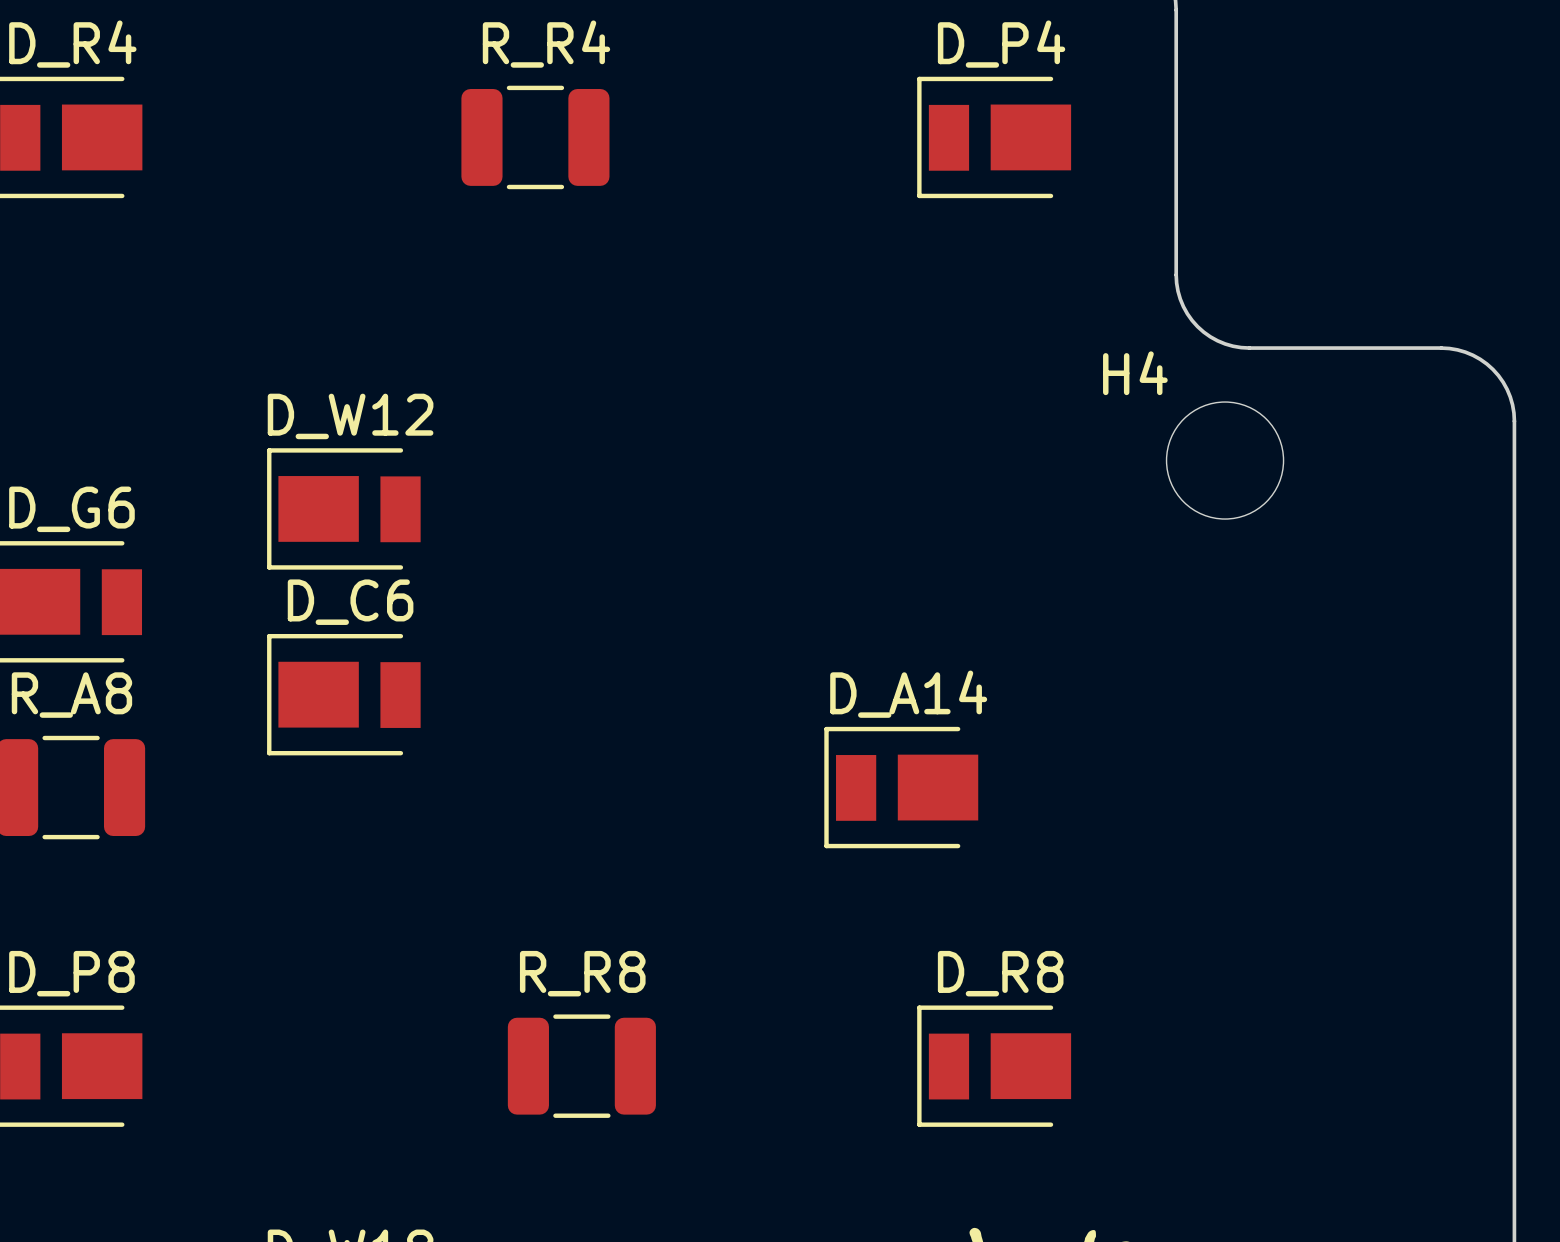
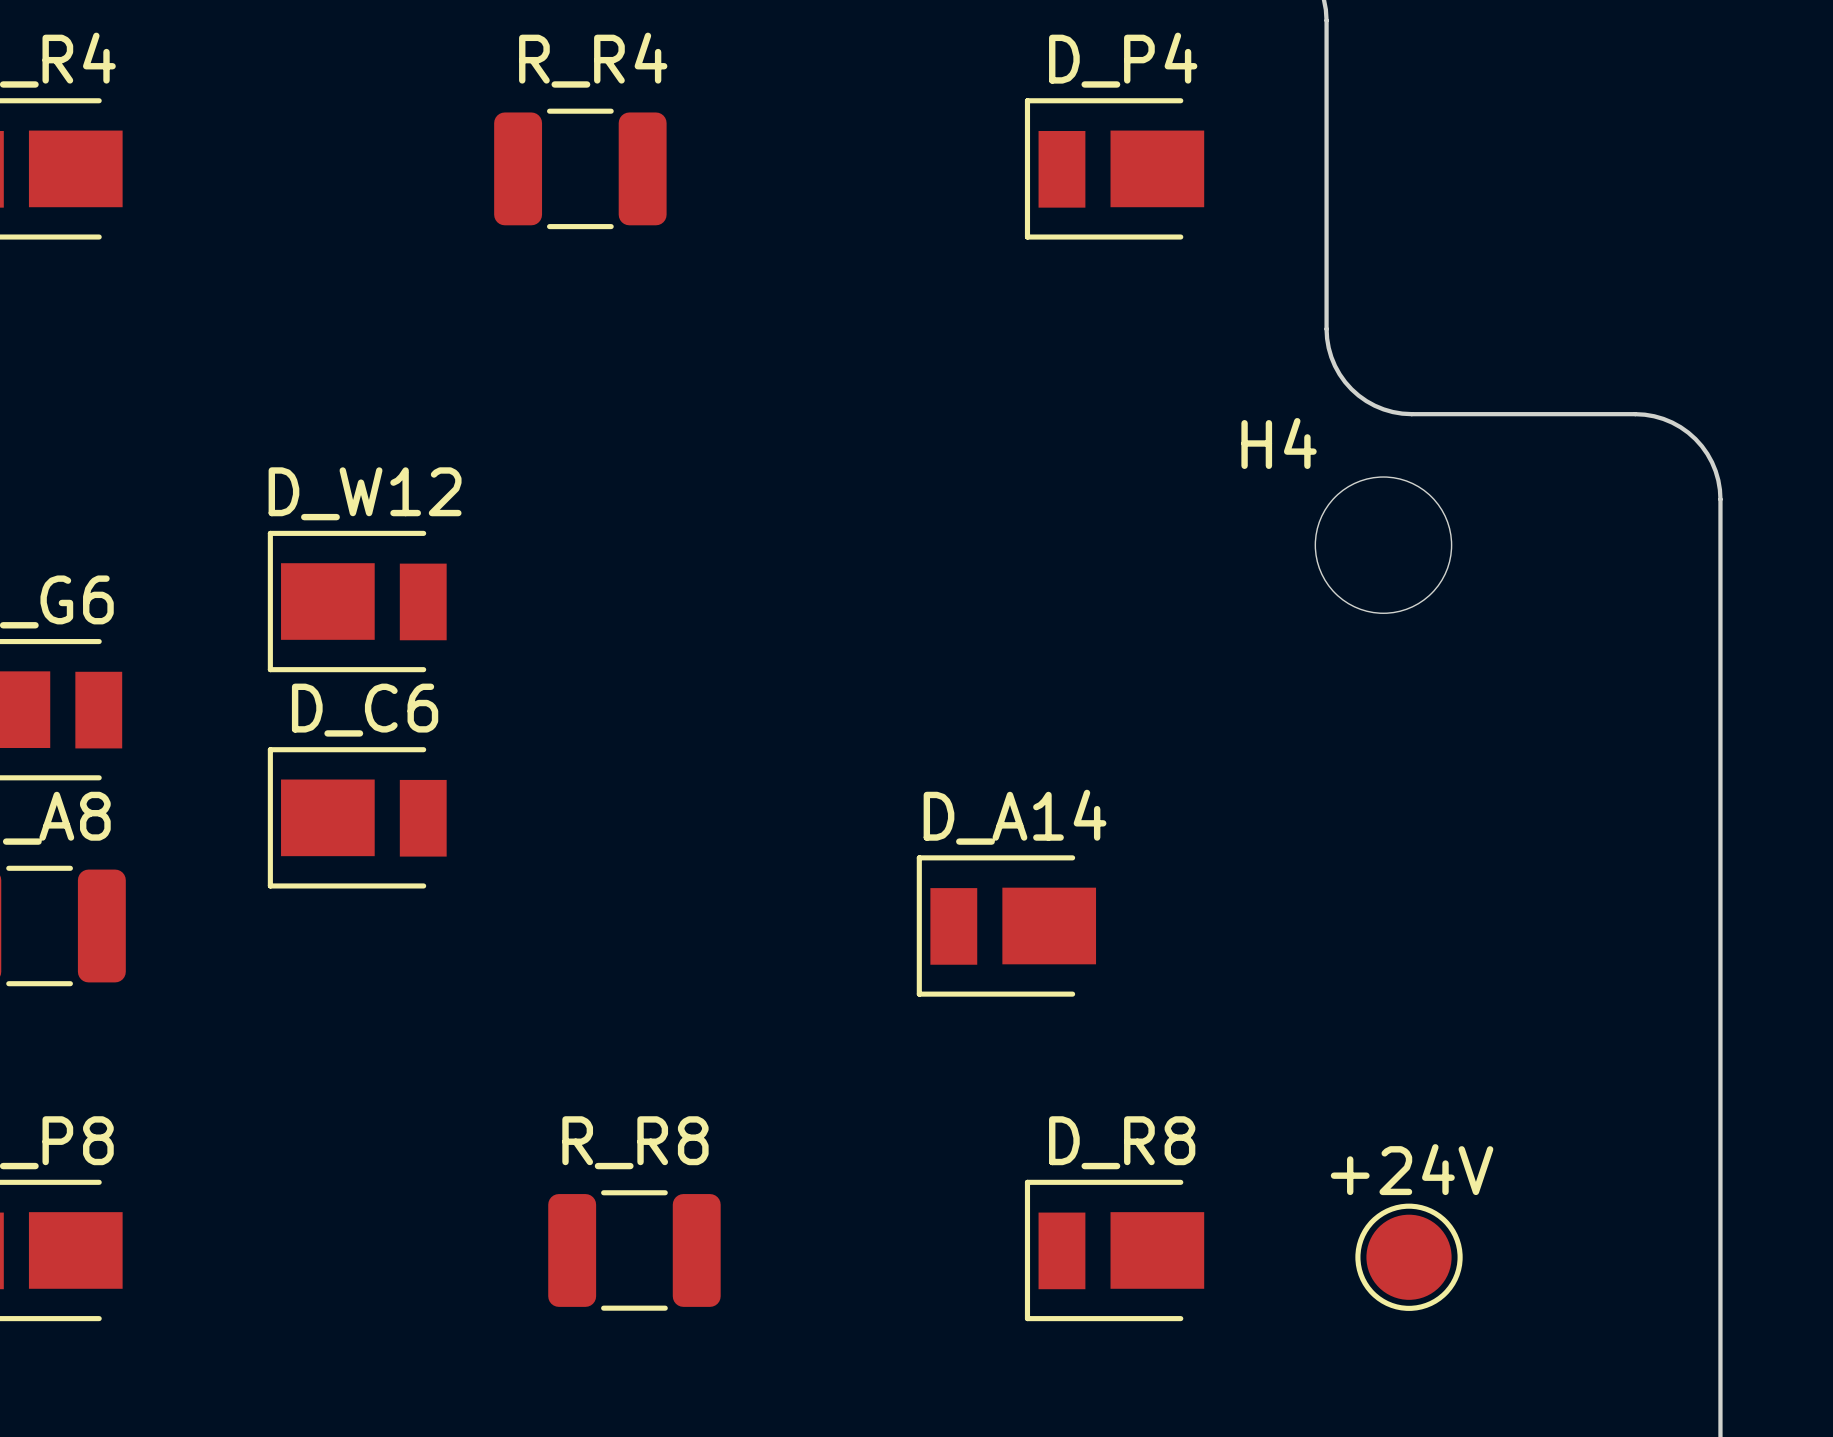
+24V: none -> (1409, 1257)

